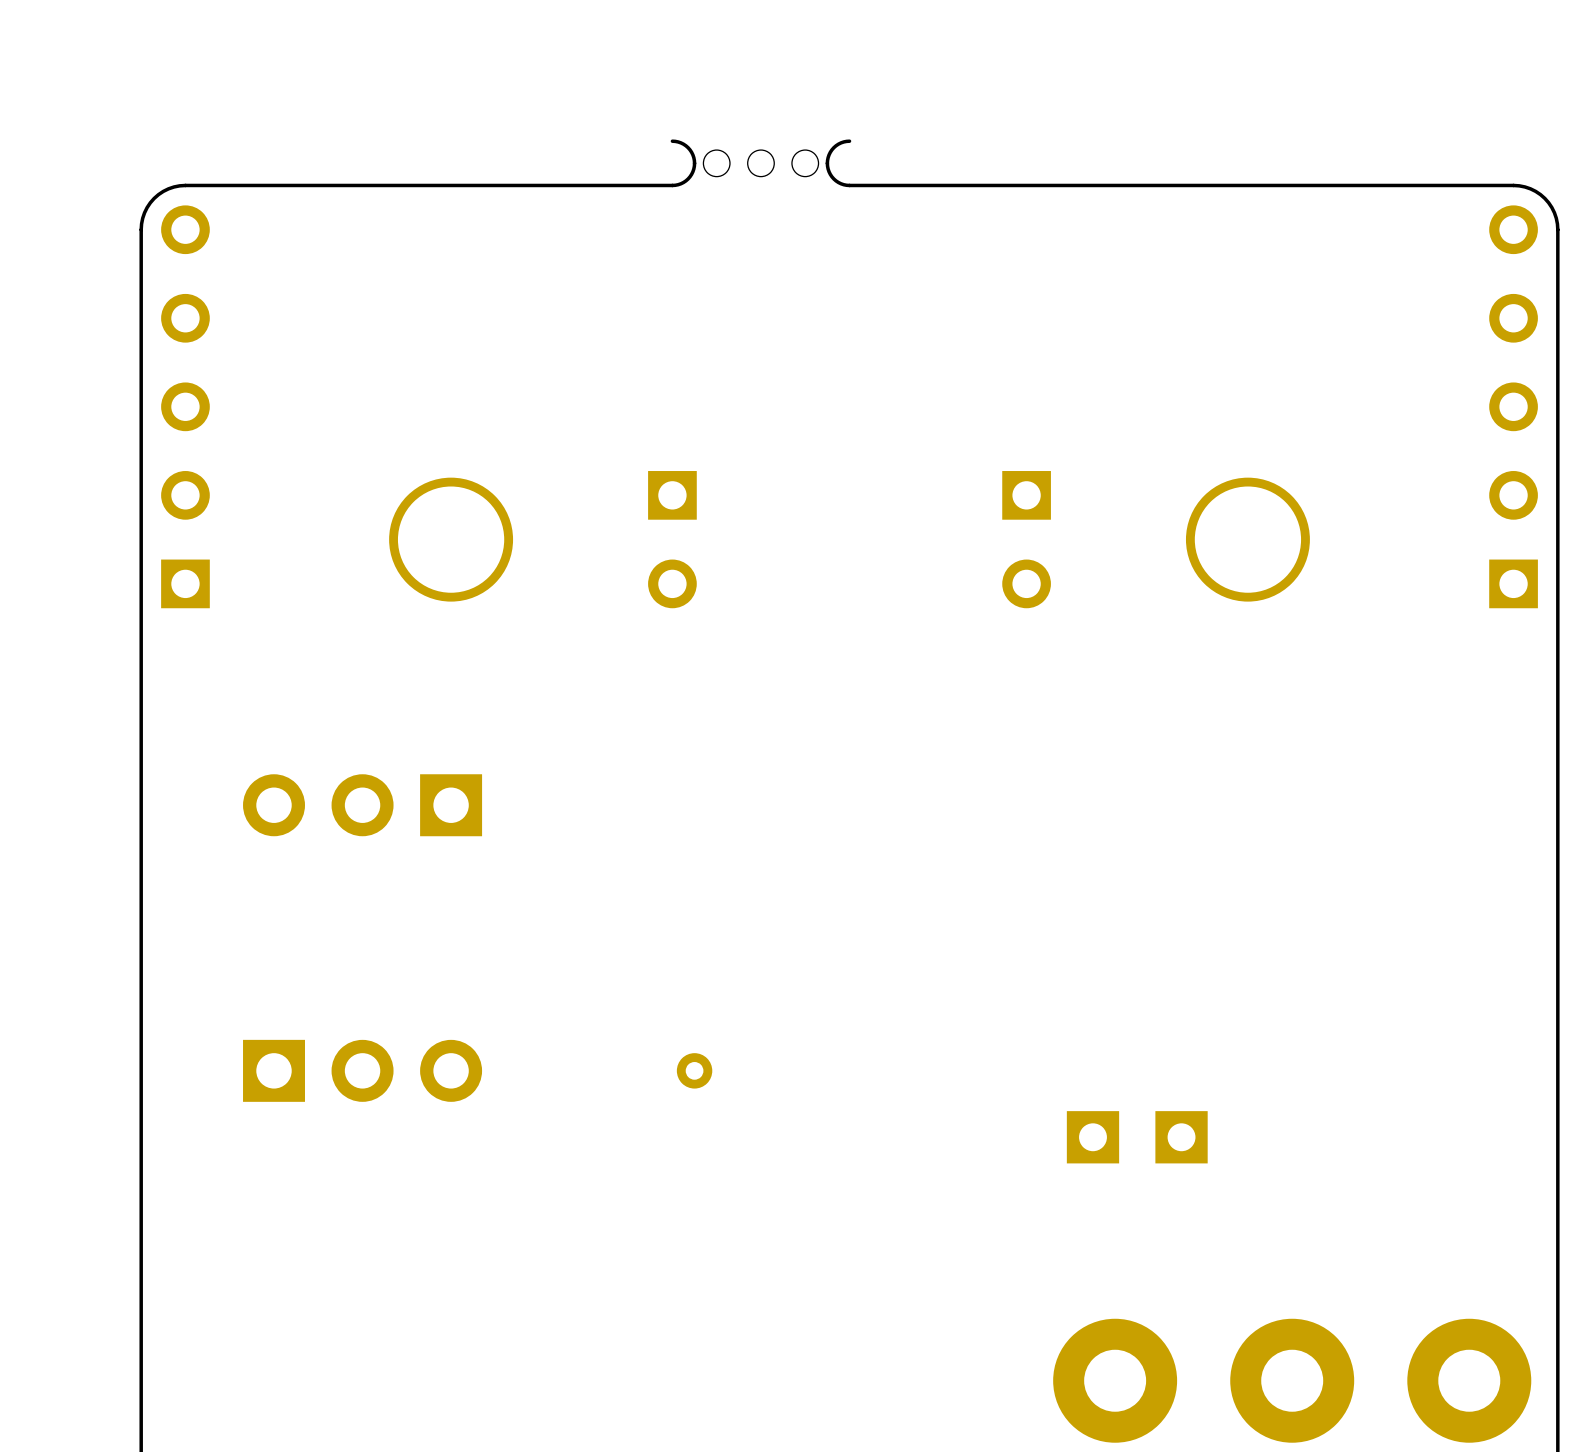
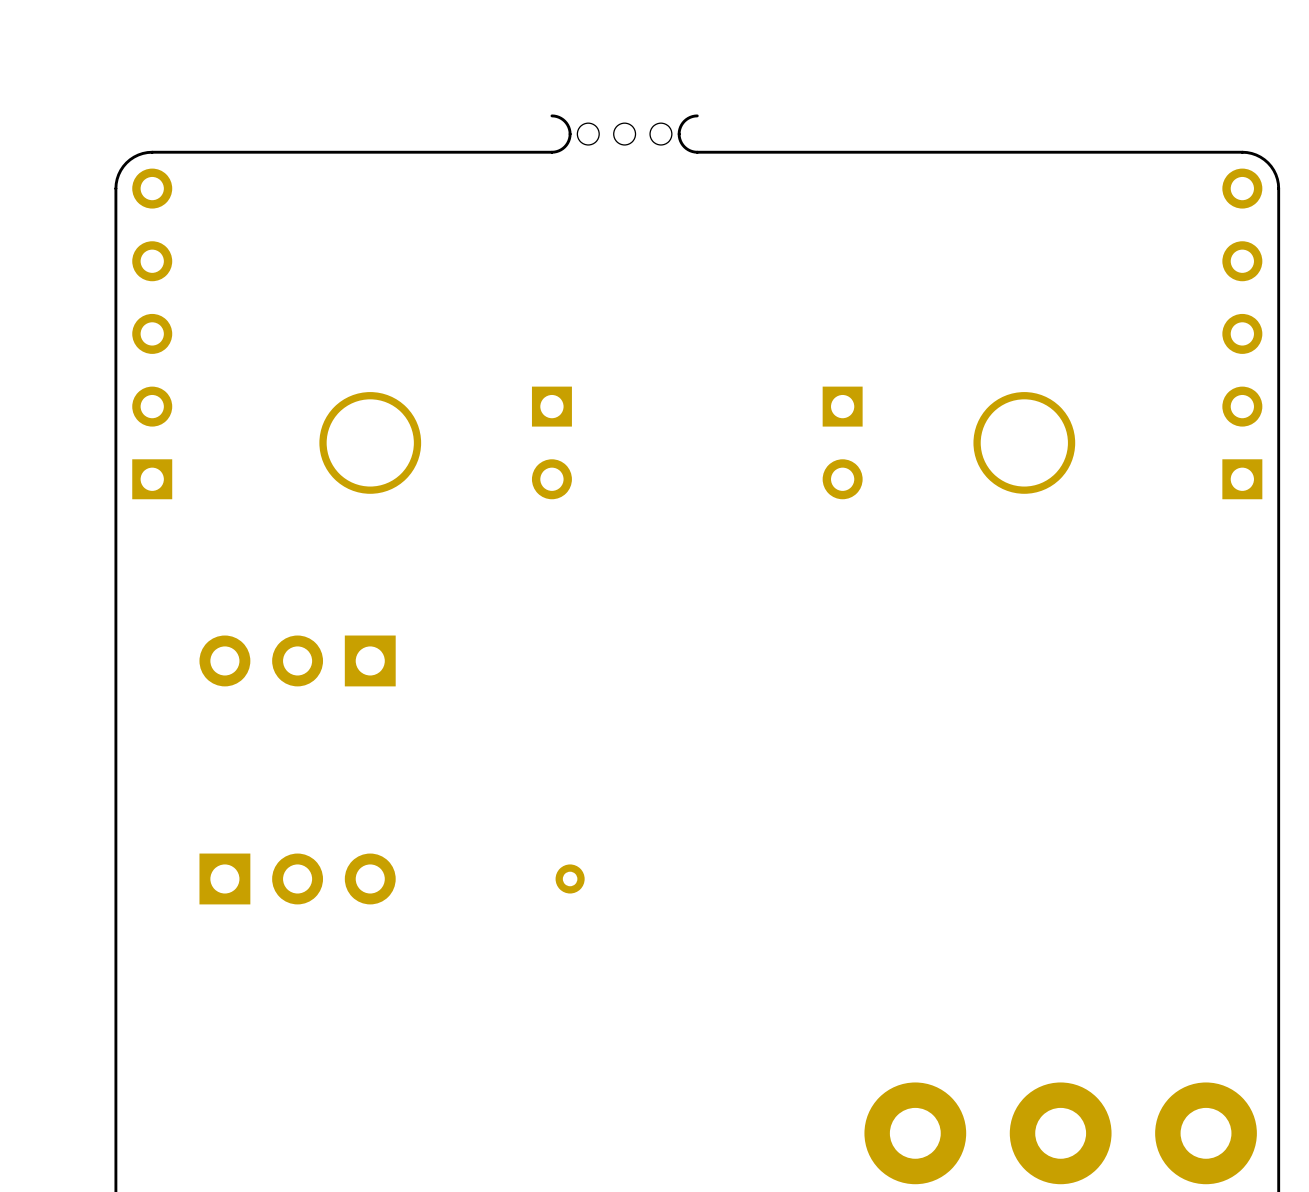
part: (1092, 1137) -> none
part: (1181, 1137) -> none

